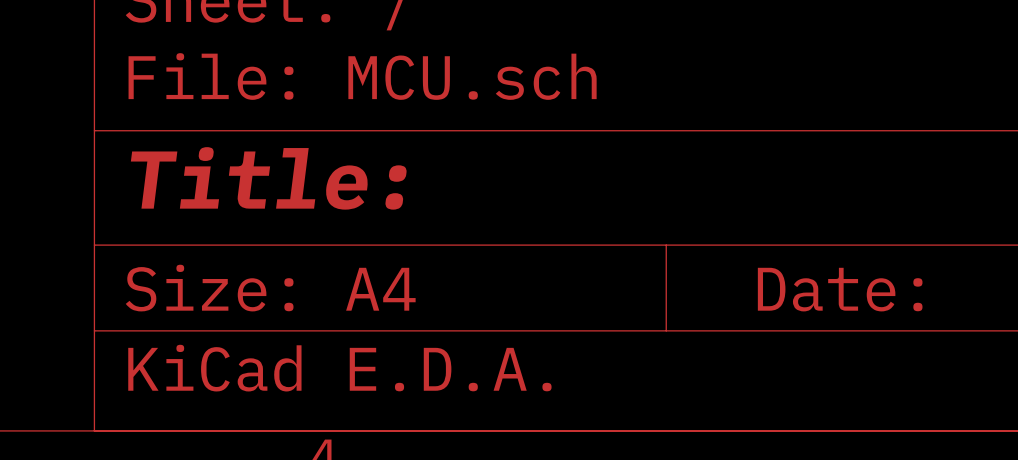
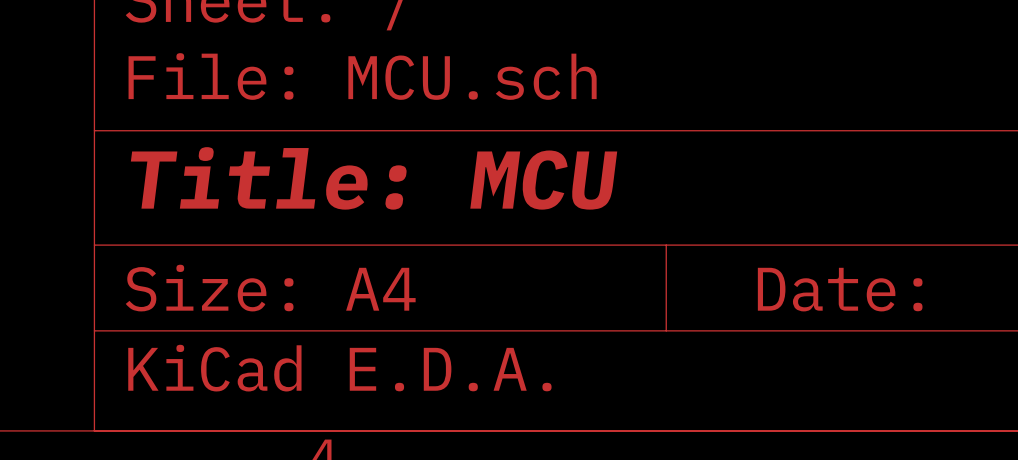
title block: Title: (268, 178) -> Title: MCU (374, 178)

